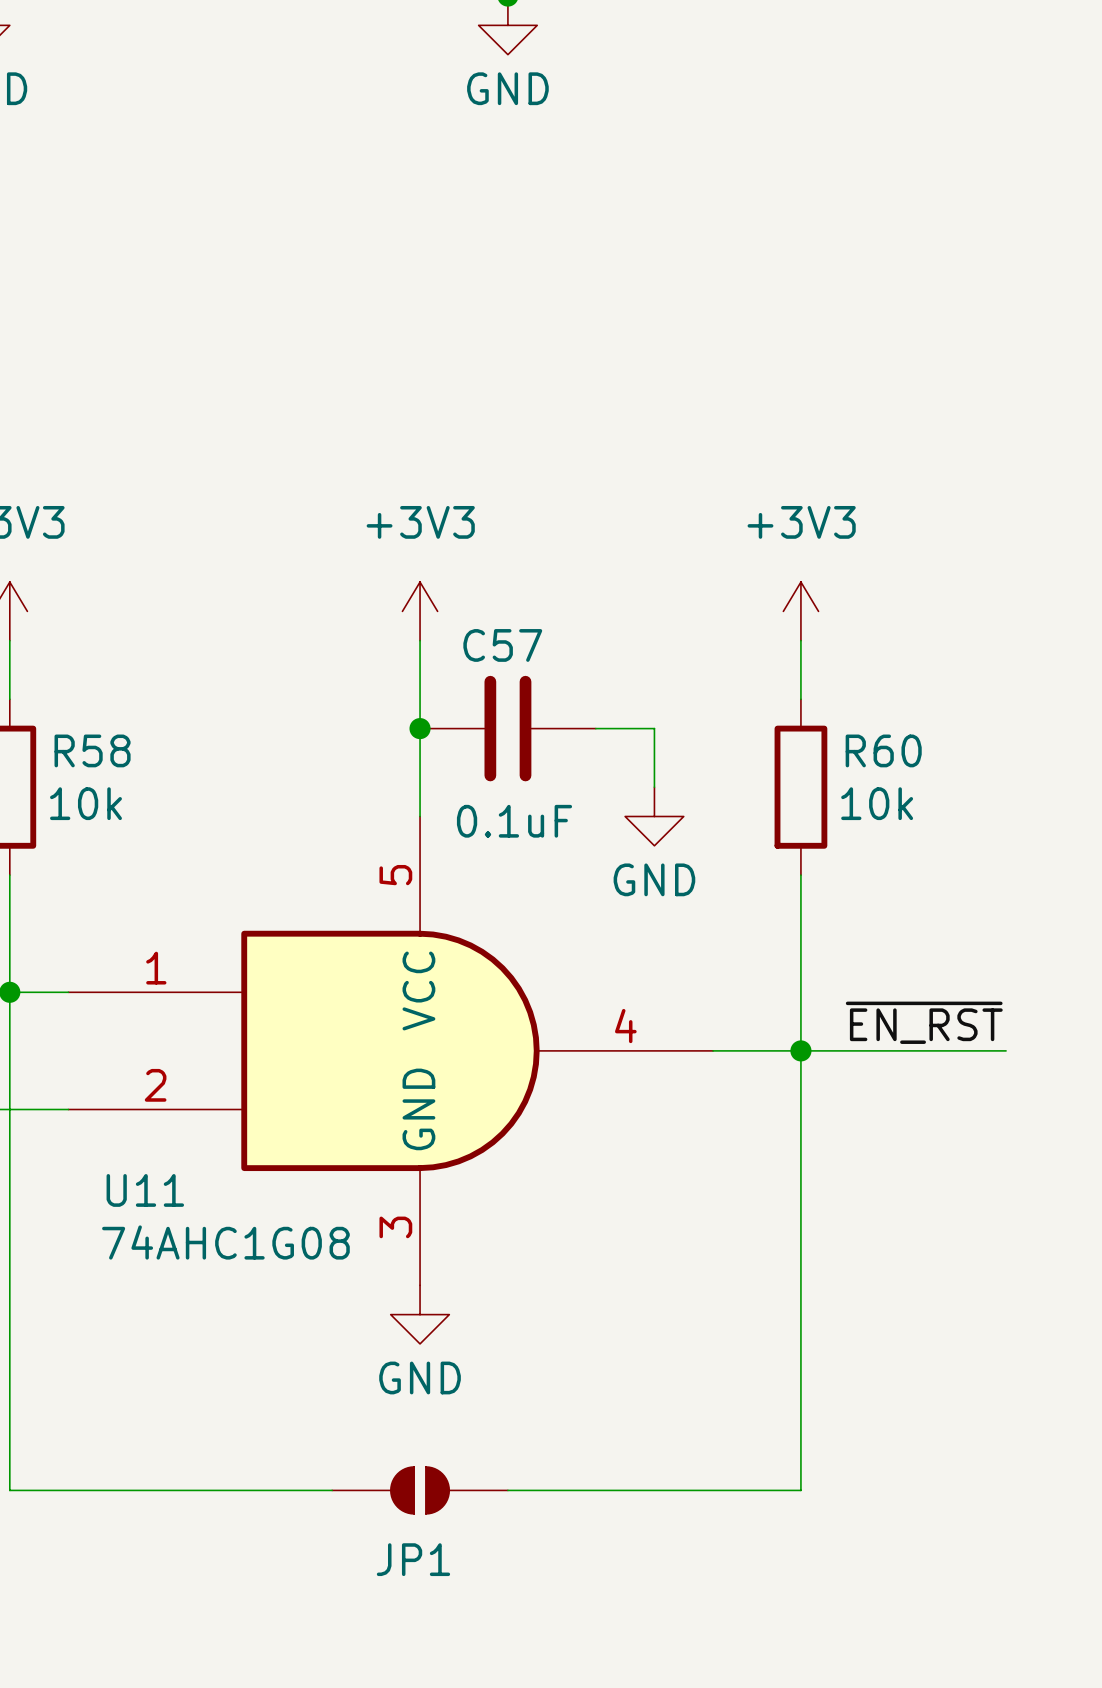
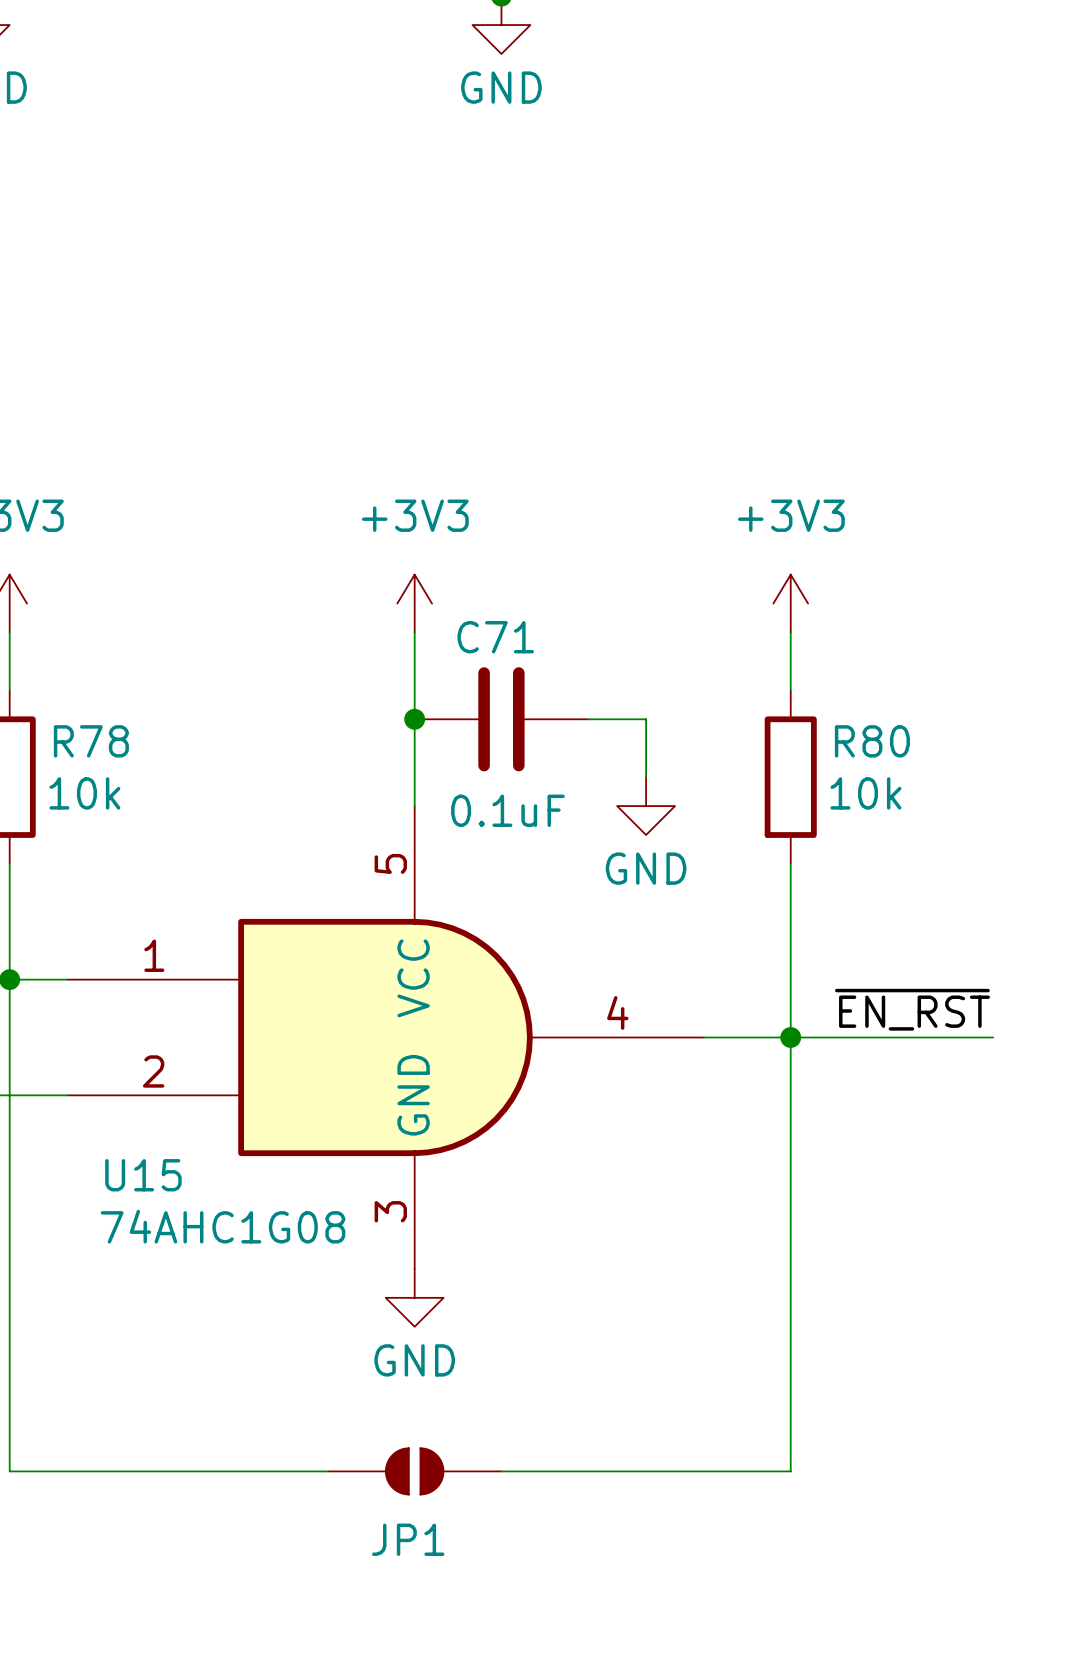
C57 name: C57 (502, 645) -> C71 (495, 637)
R58 name: R58 (92, 750) -> R78 (91, 741)
R60 name: R60 (883, 750) -> R80 (872, 741)
U11 name: U11 (145, 1190) -> U15 (143, 1175)

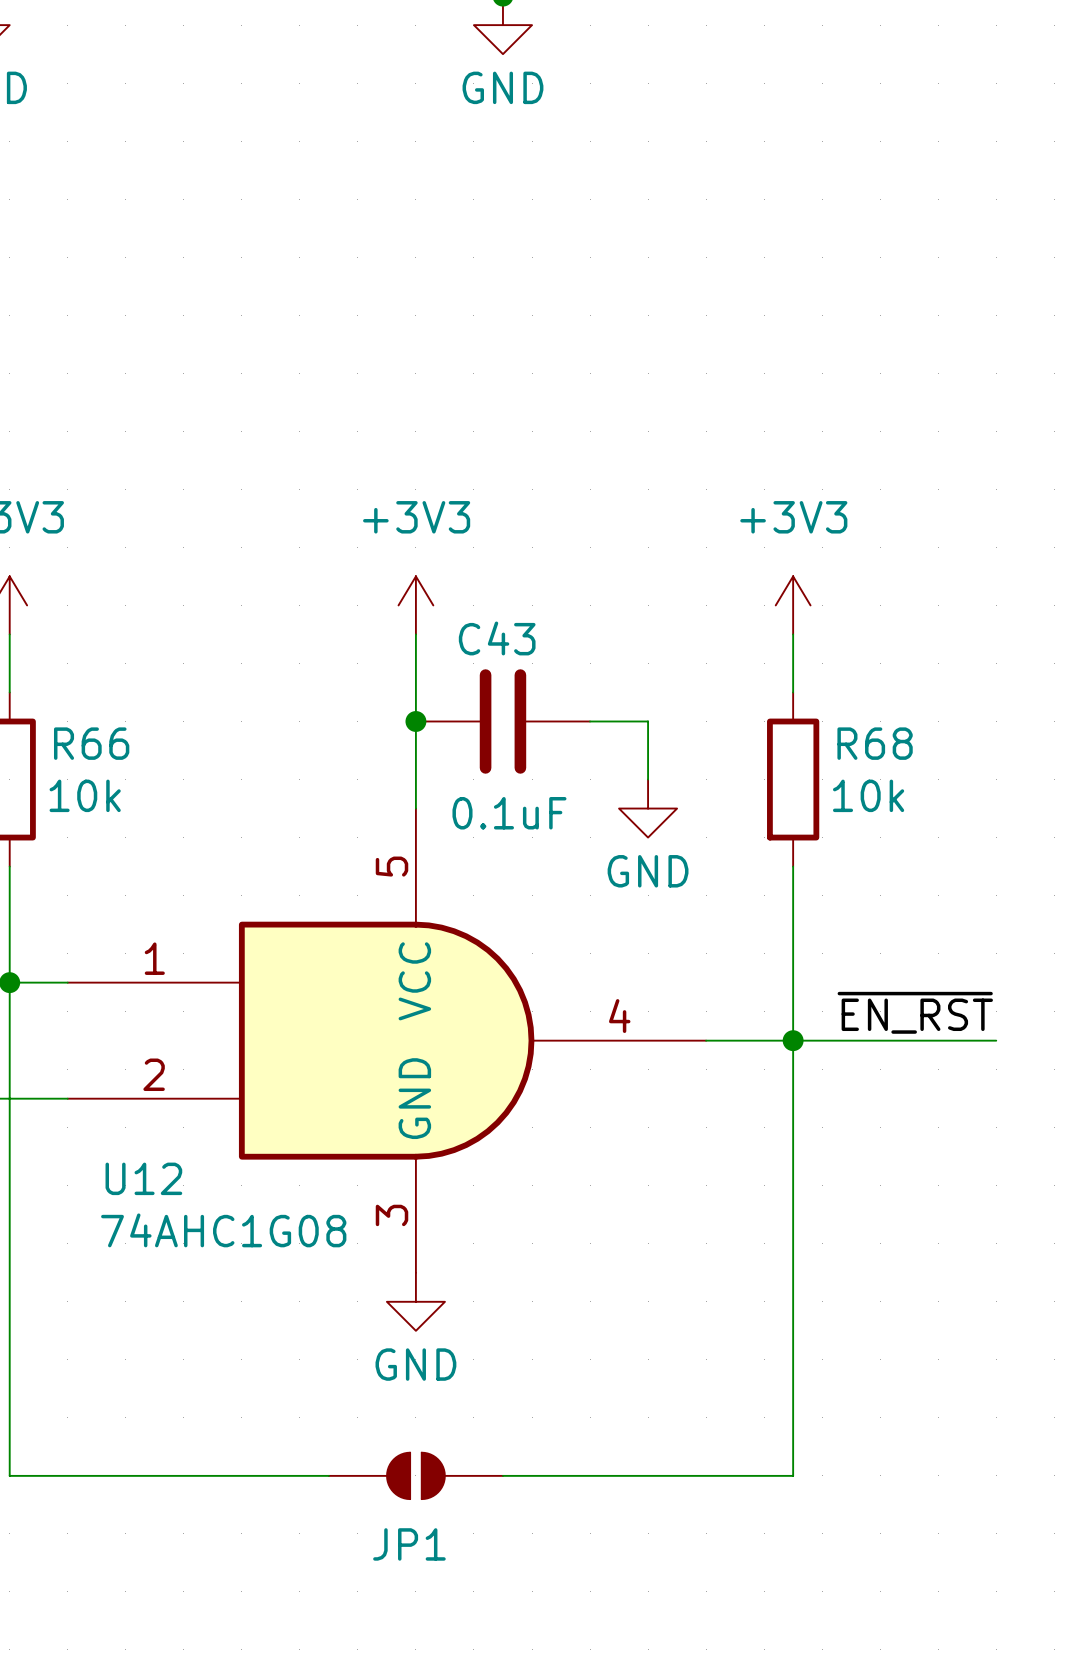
C71 name: C71 (495, 637) -> C43 (497, 638)
R78 name: R78 (91, 741) -> R66 (91, 743)
R80 name: R80 (872, 741) -> R68 (875, 743)
U15 name: U15 (143, 1175) -> U12 (143, 1178)

